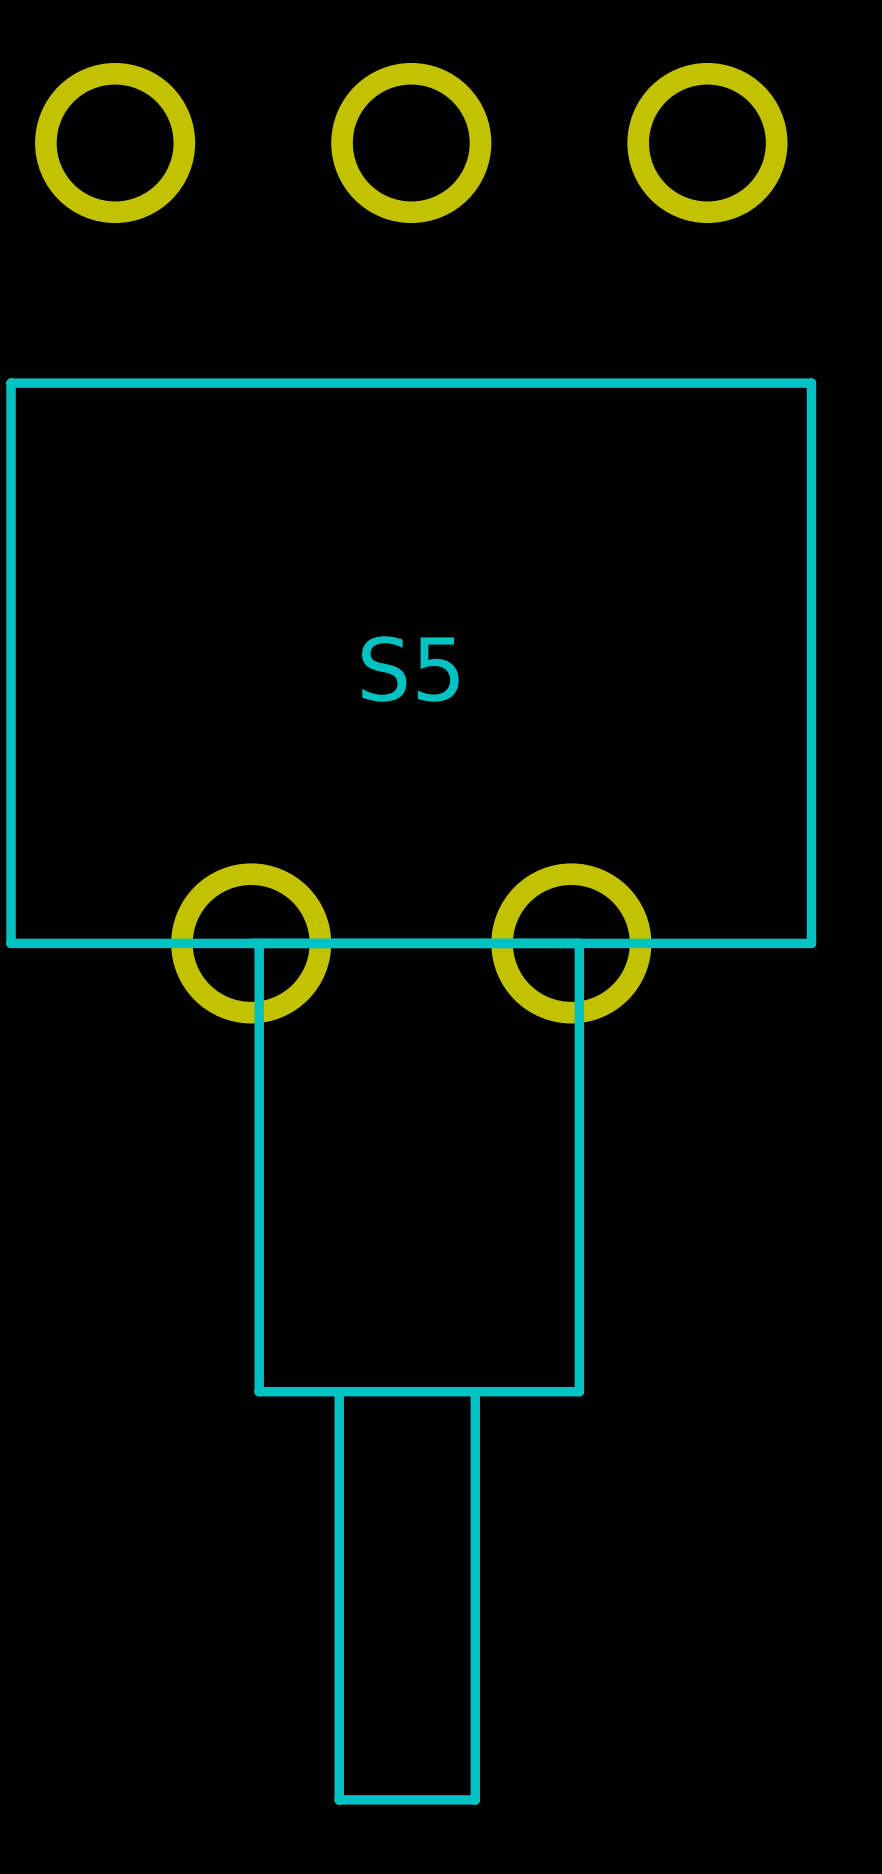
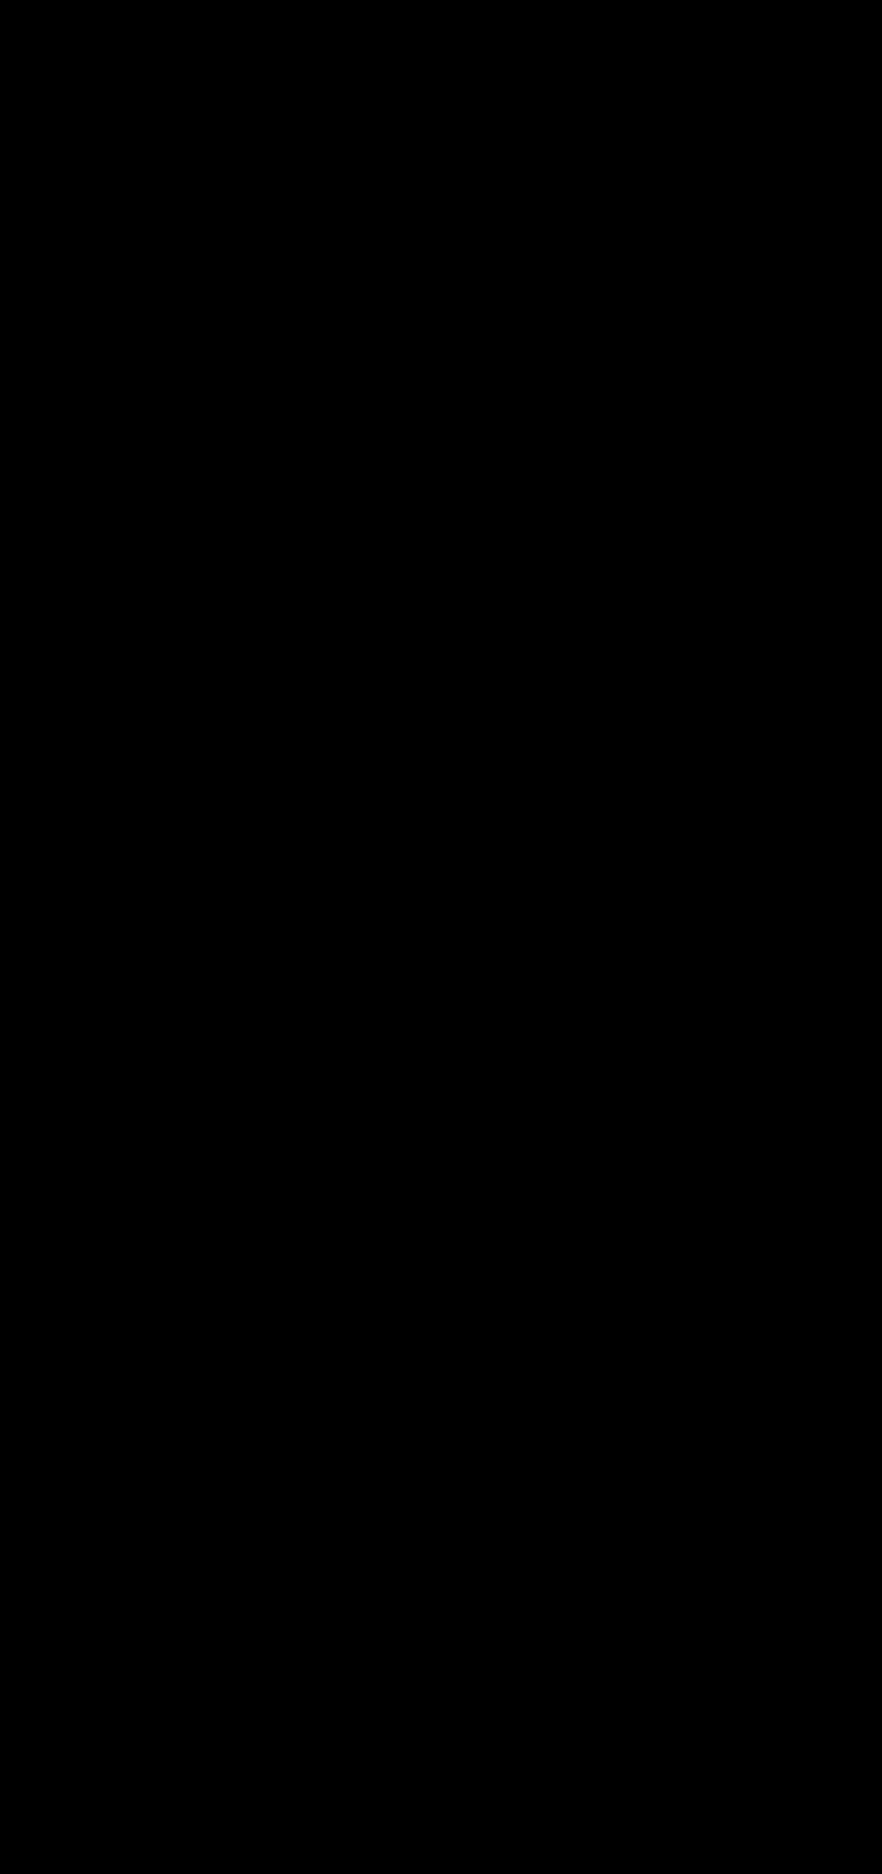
S5: (411, 933) -> none

